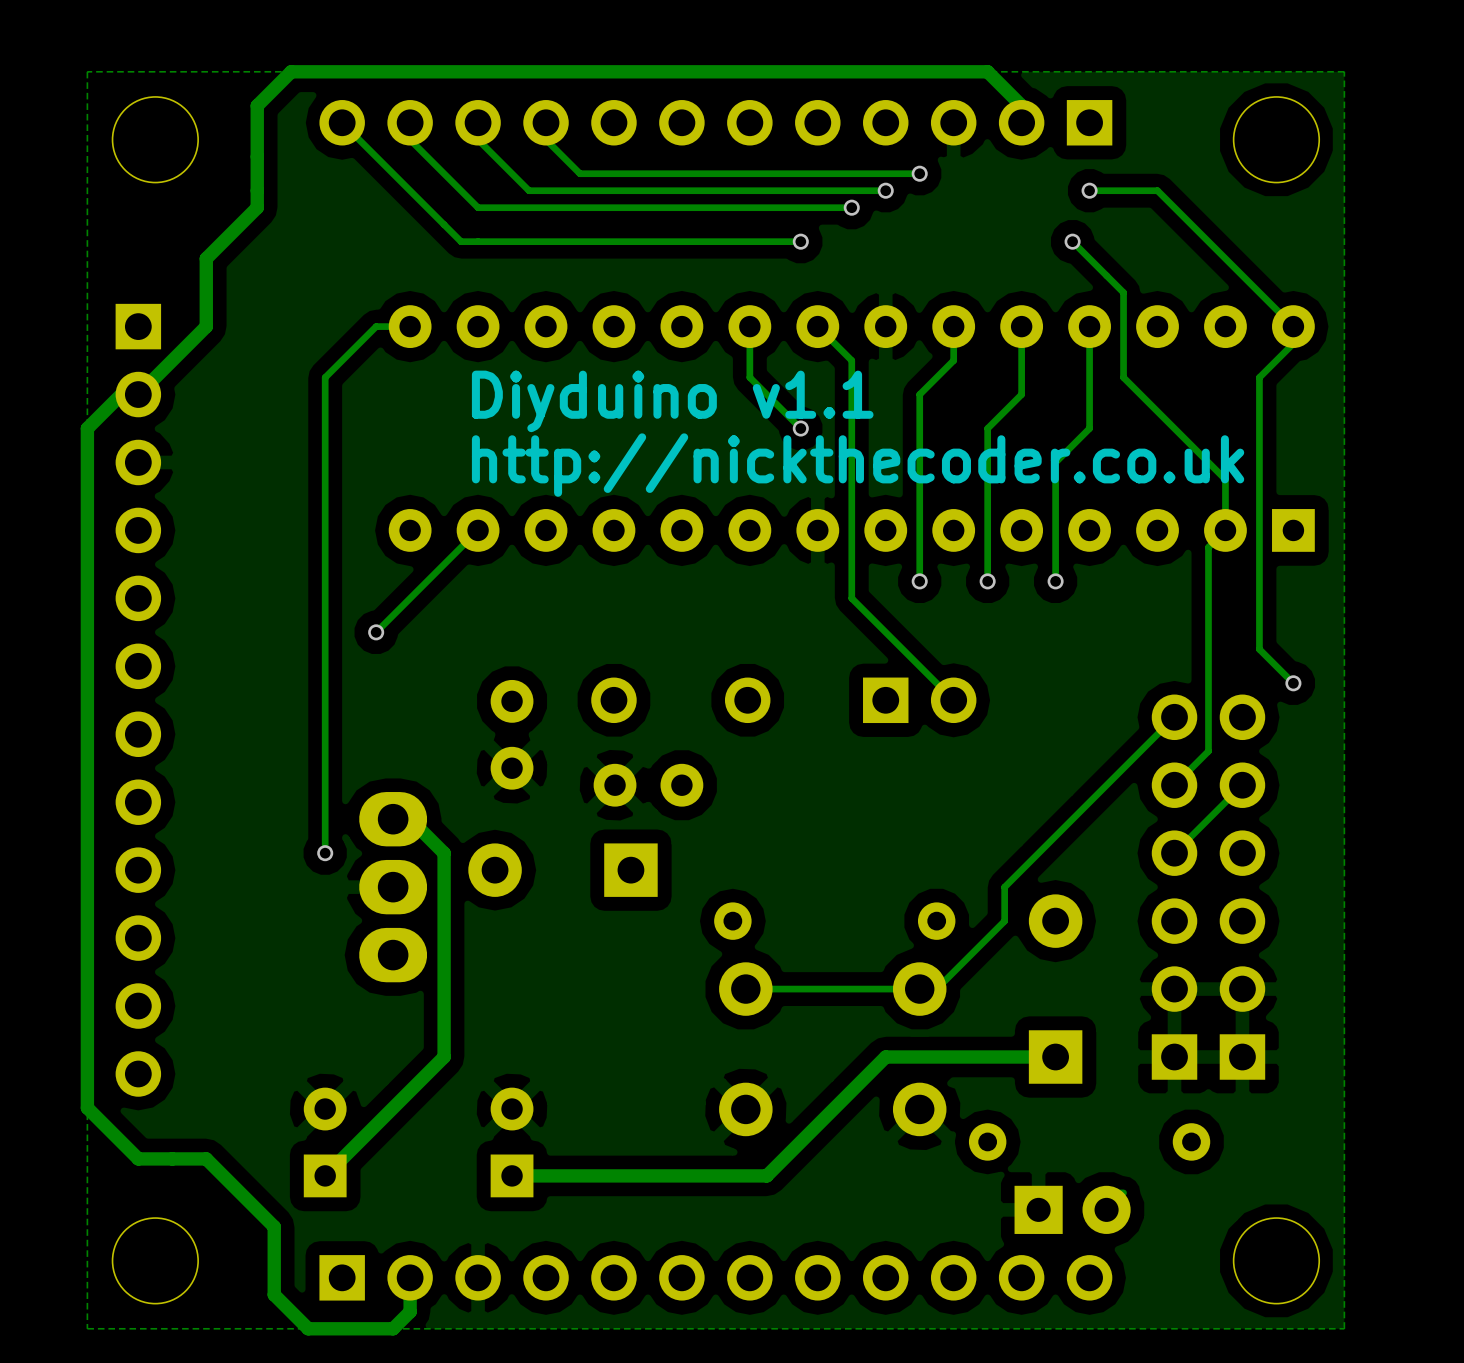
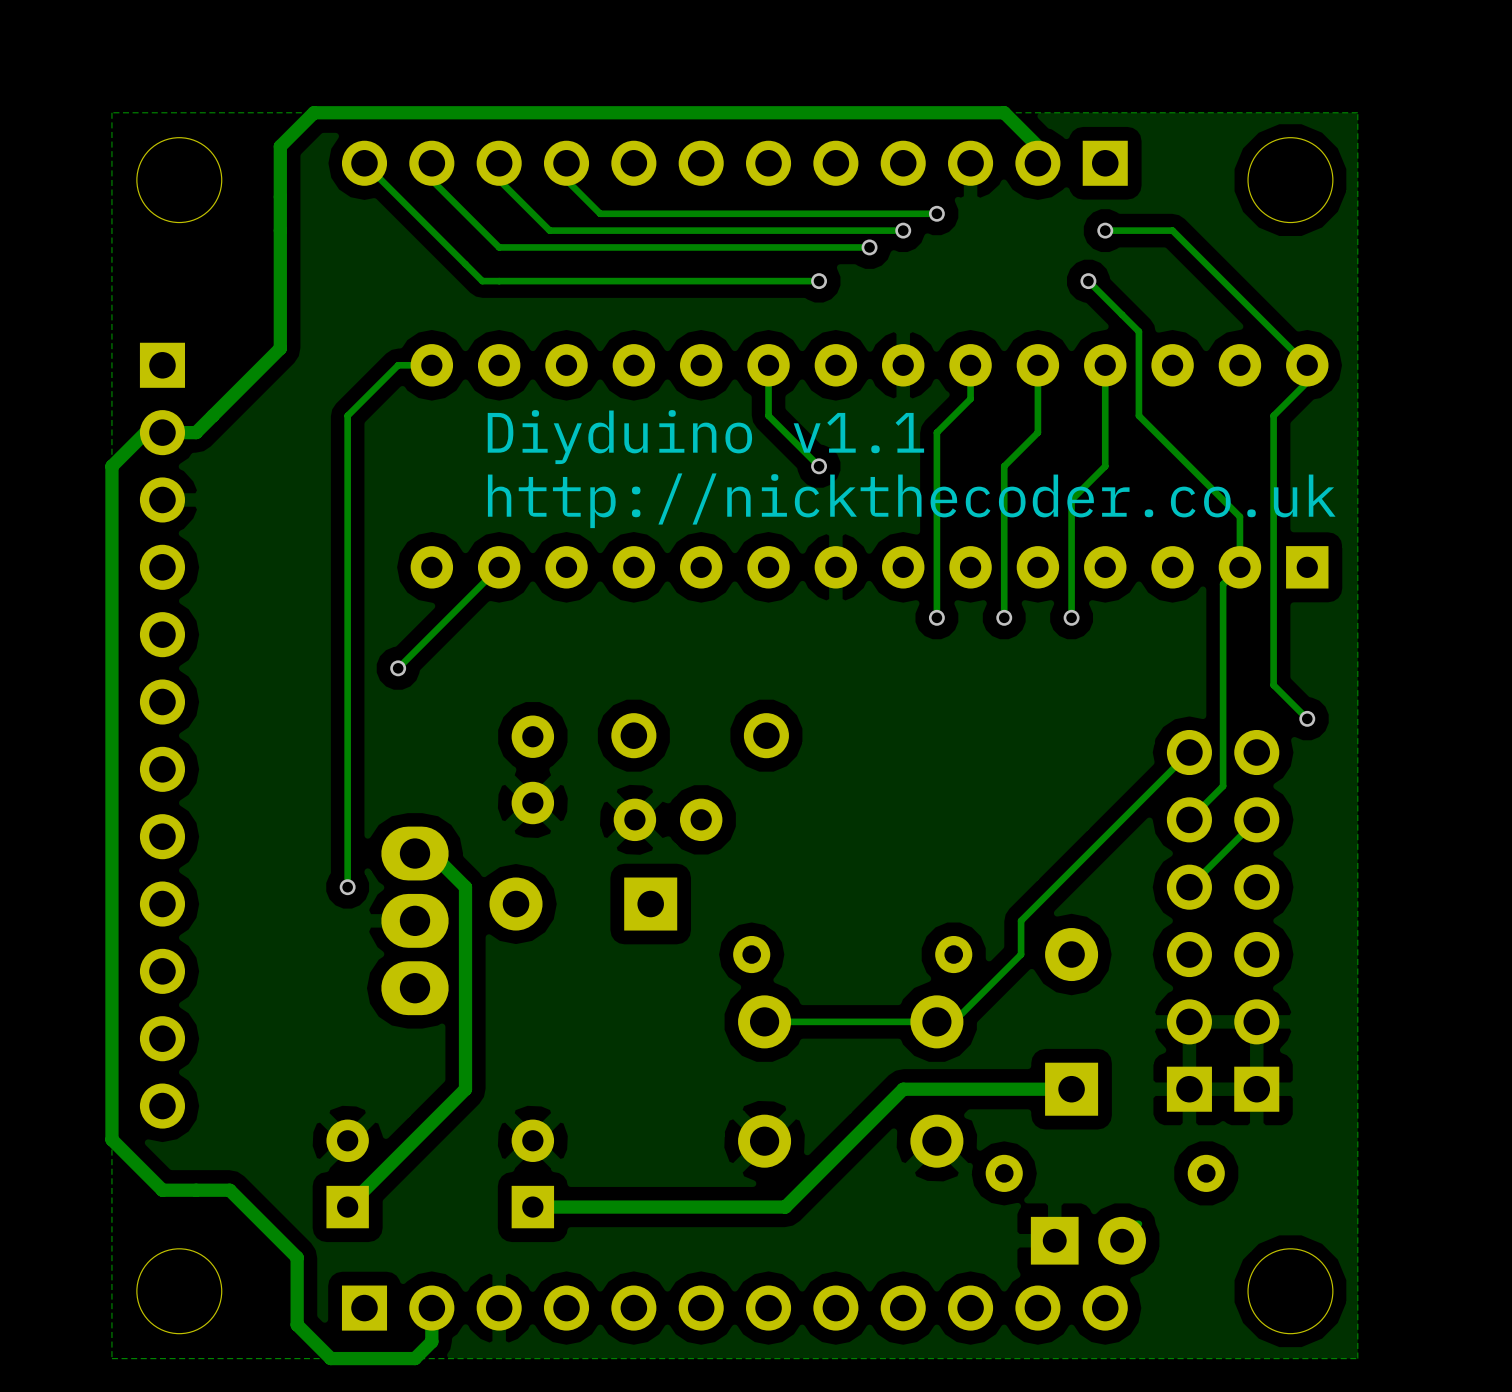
track: (257, 207) (206, 258) (206, 326) (138, 394) -> (280, 247) (280, 348) (196, 432) (162, 432)
track: (817, 326) (851, 360) (851, 598) (953, 700) -> none
part: (919, 700) -> none

